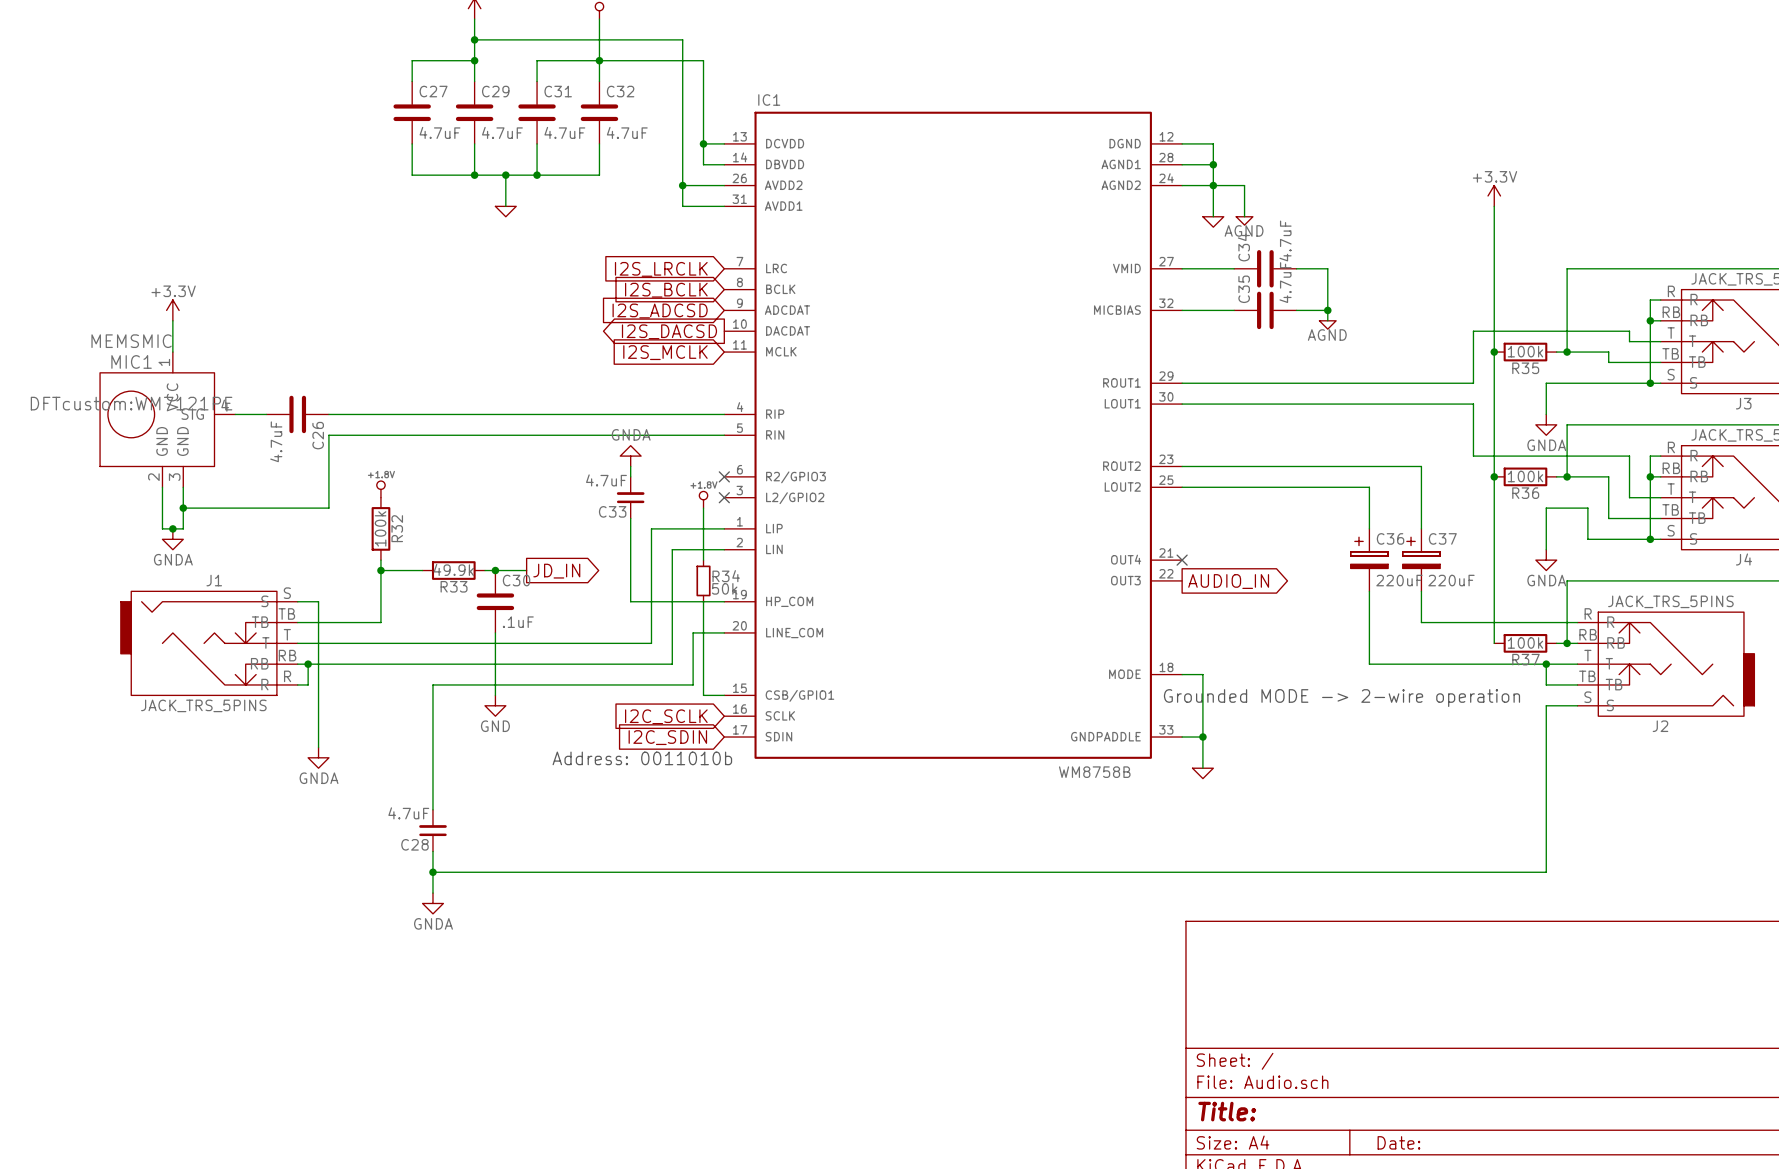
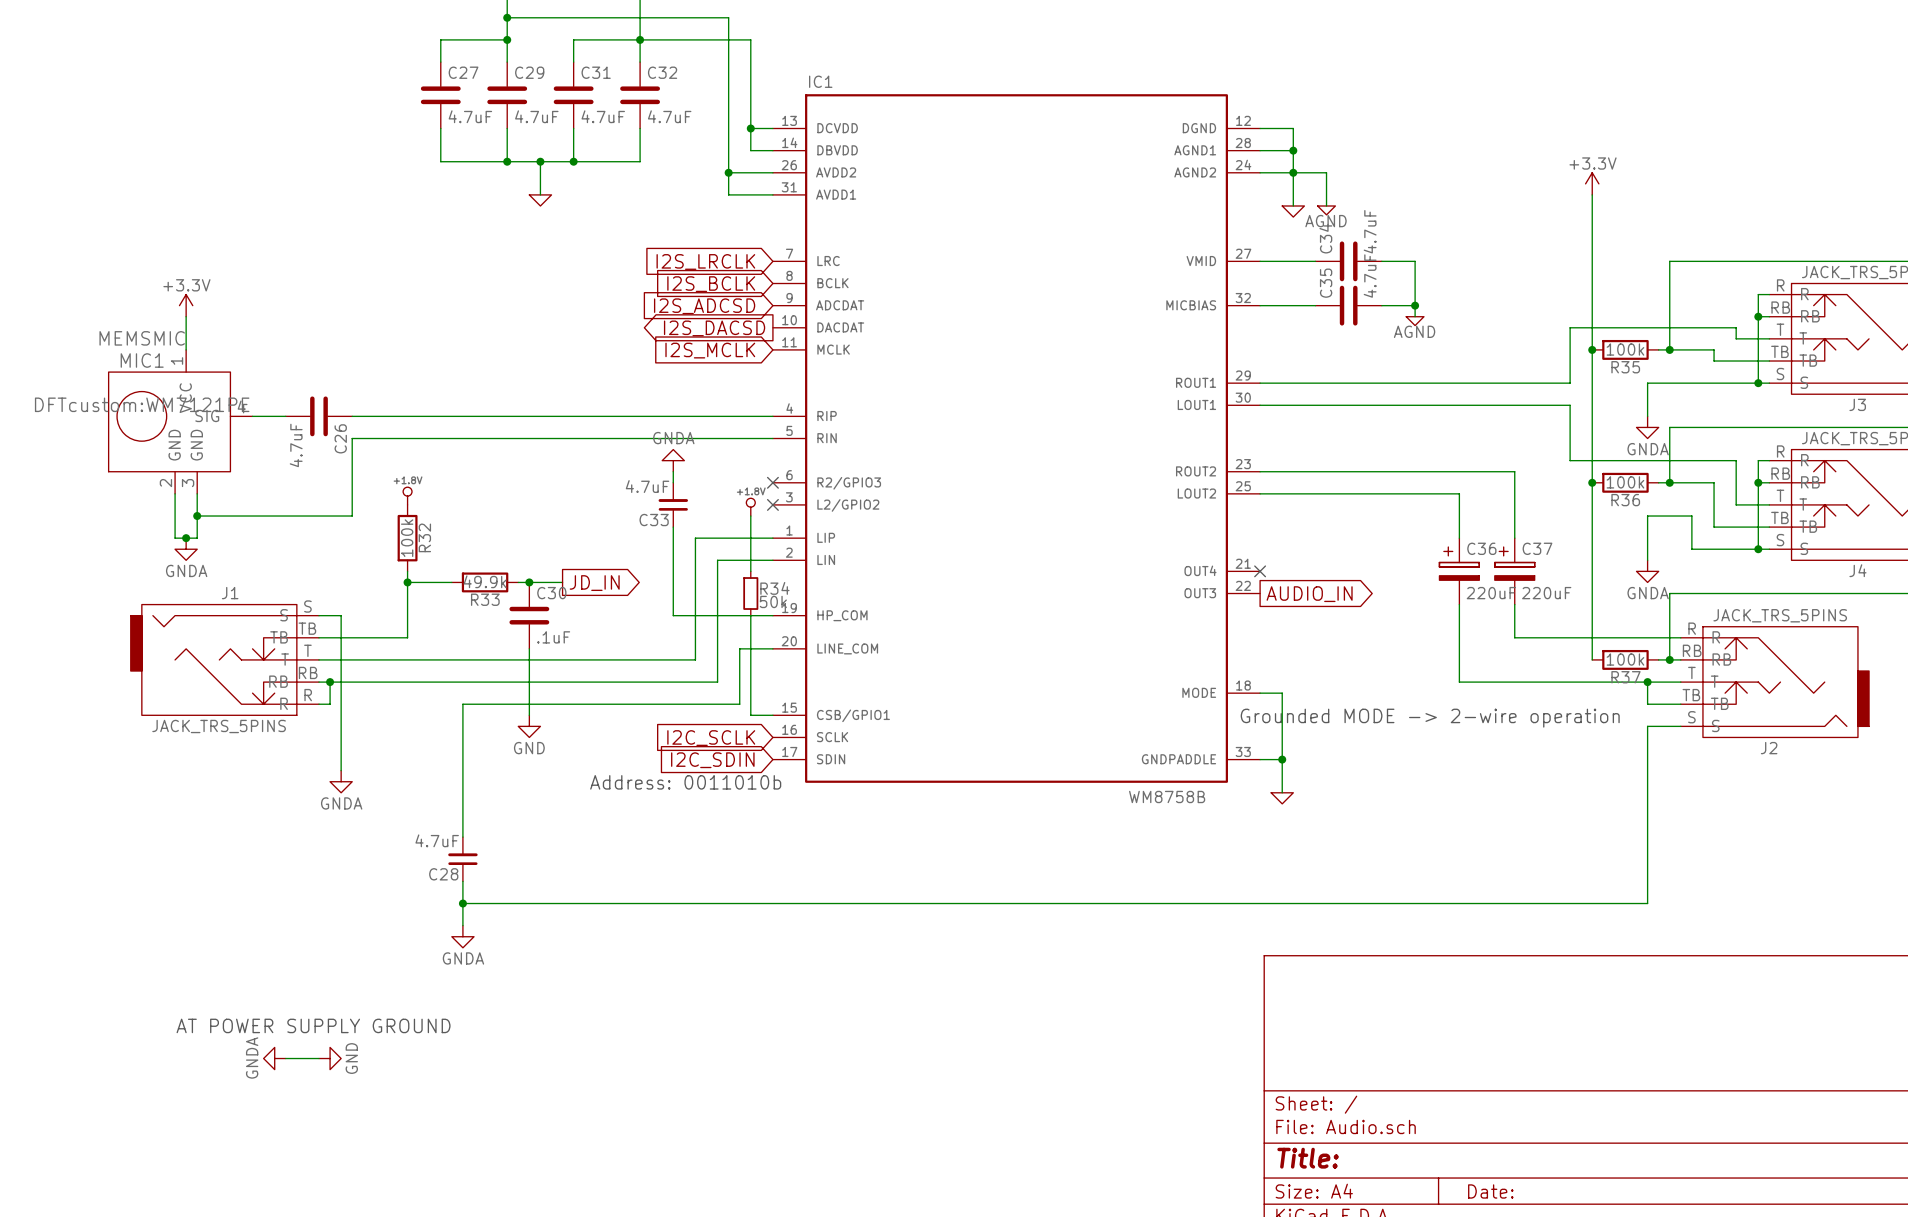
text: none -> AT POWER SUPPLY GROUND (313, 1025)
power symbol: none -> GNDA (274, 1058)
wire: none -> (285, 1058) (318, 1058)
power symbol: none -> GND (330, 1058)

